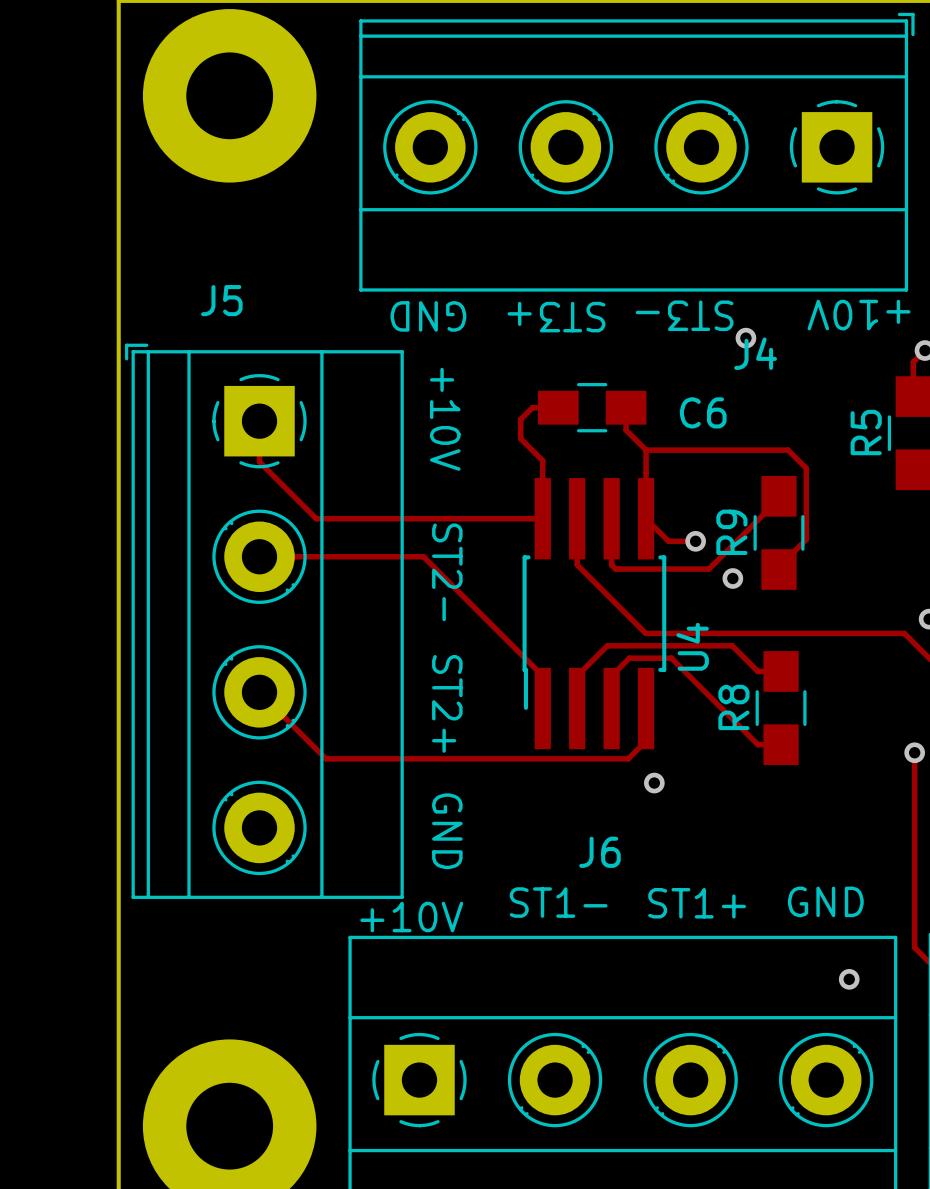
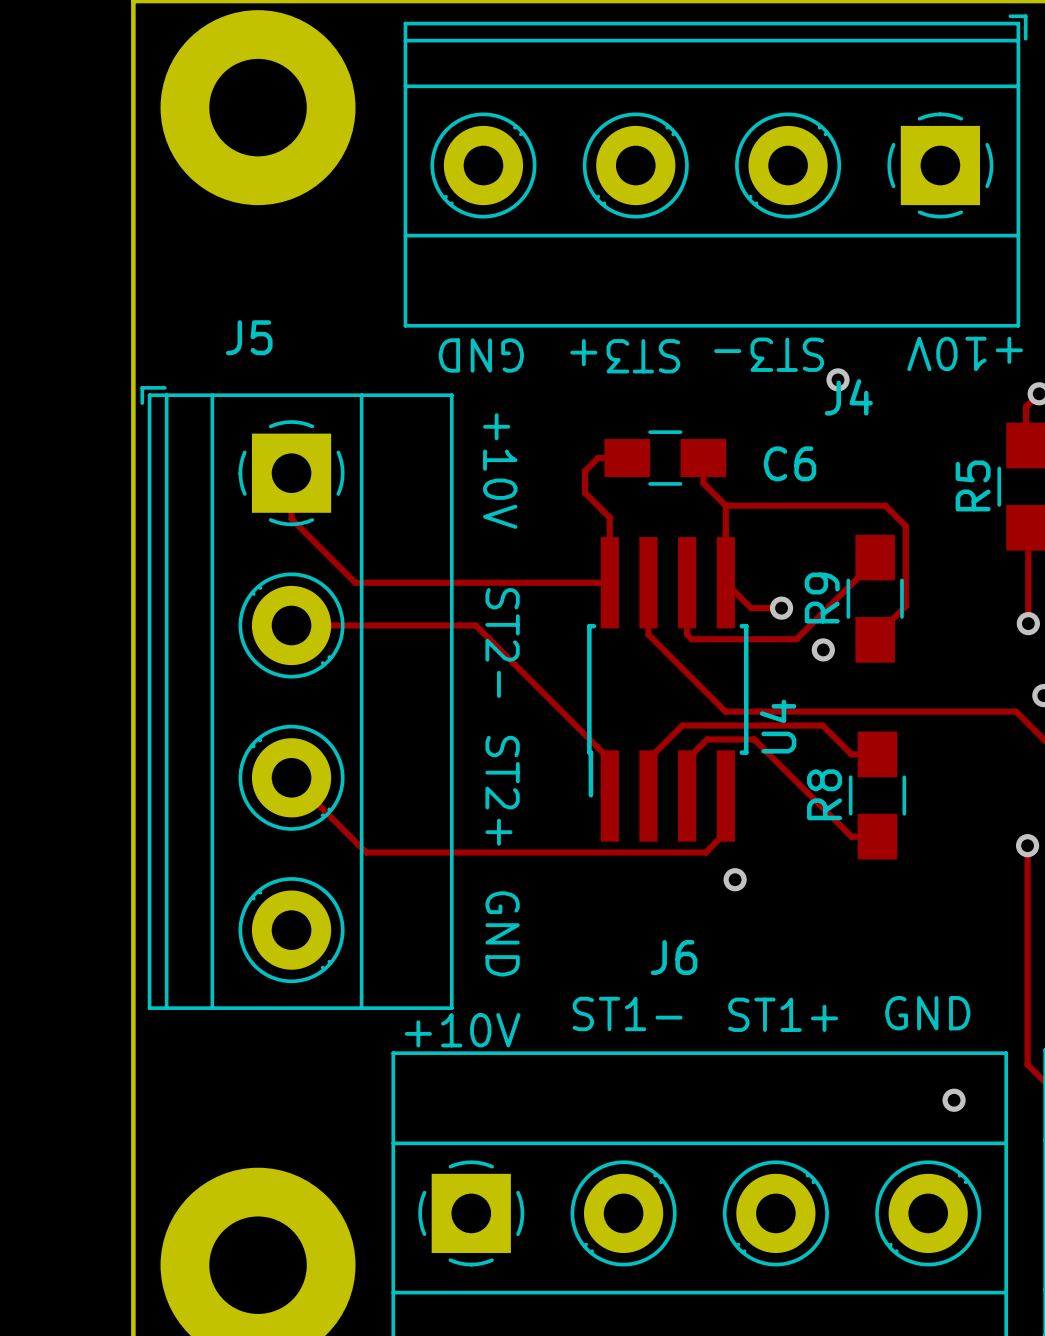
track: none -> (1026, 527) (1028, 530) (1028, 623)
via: none -> (1028, 623)

